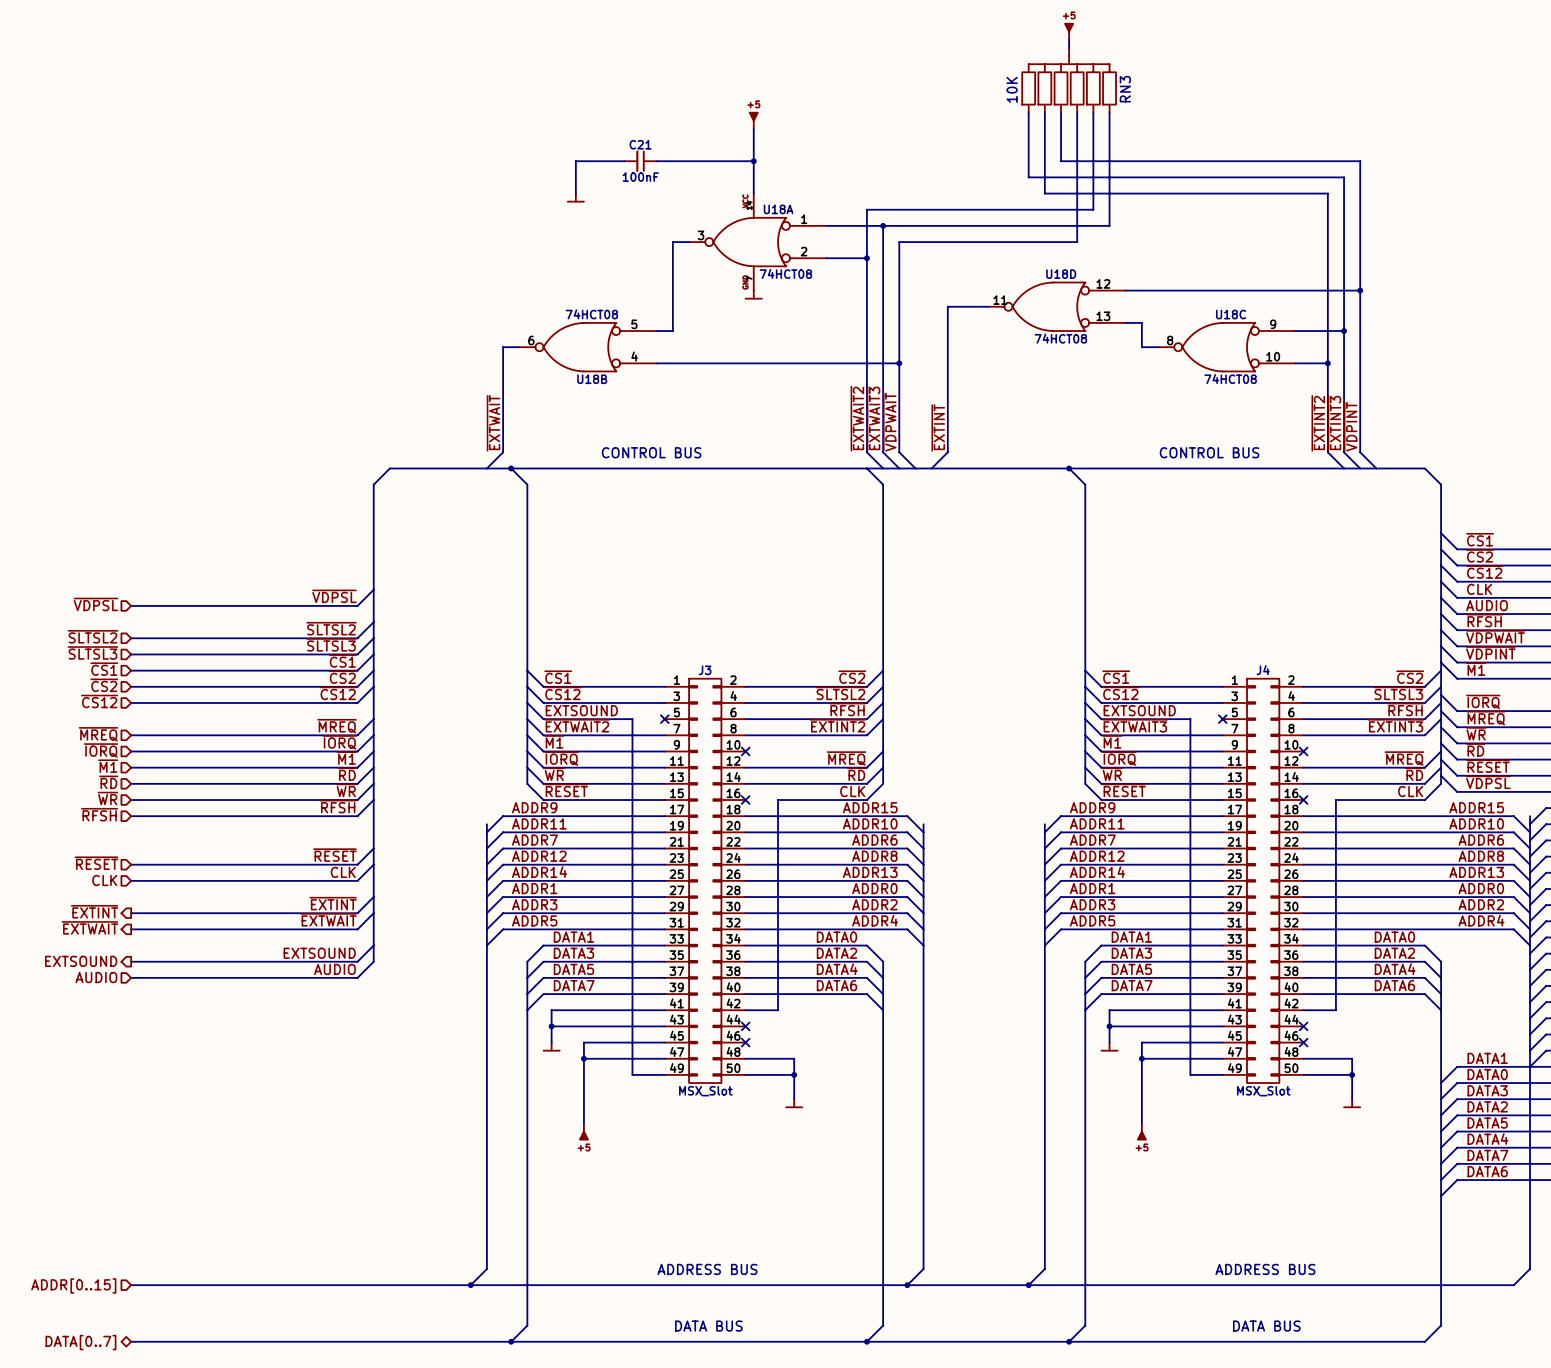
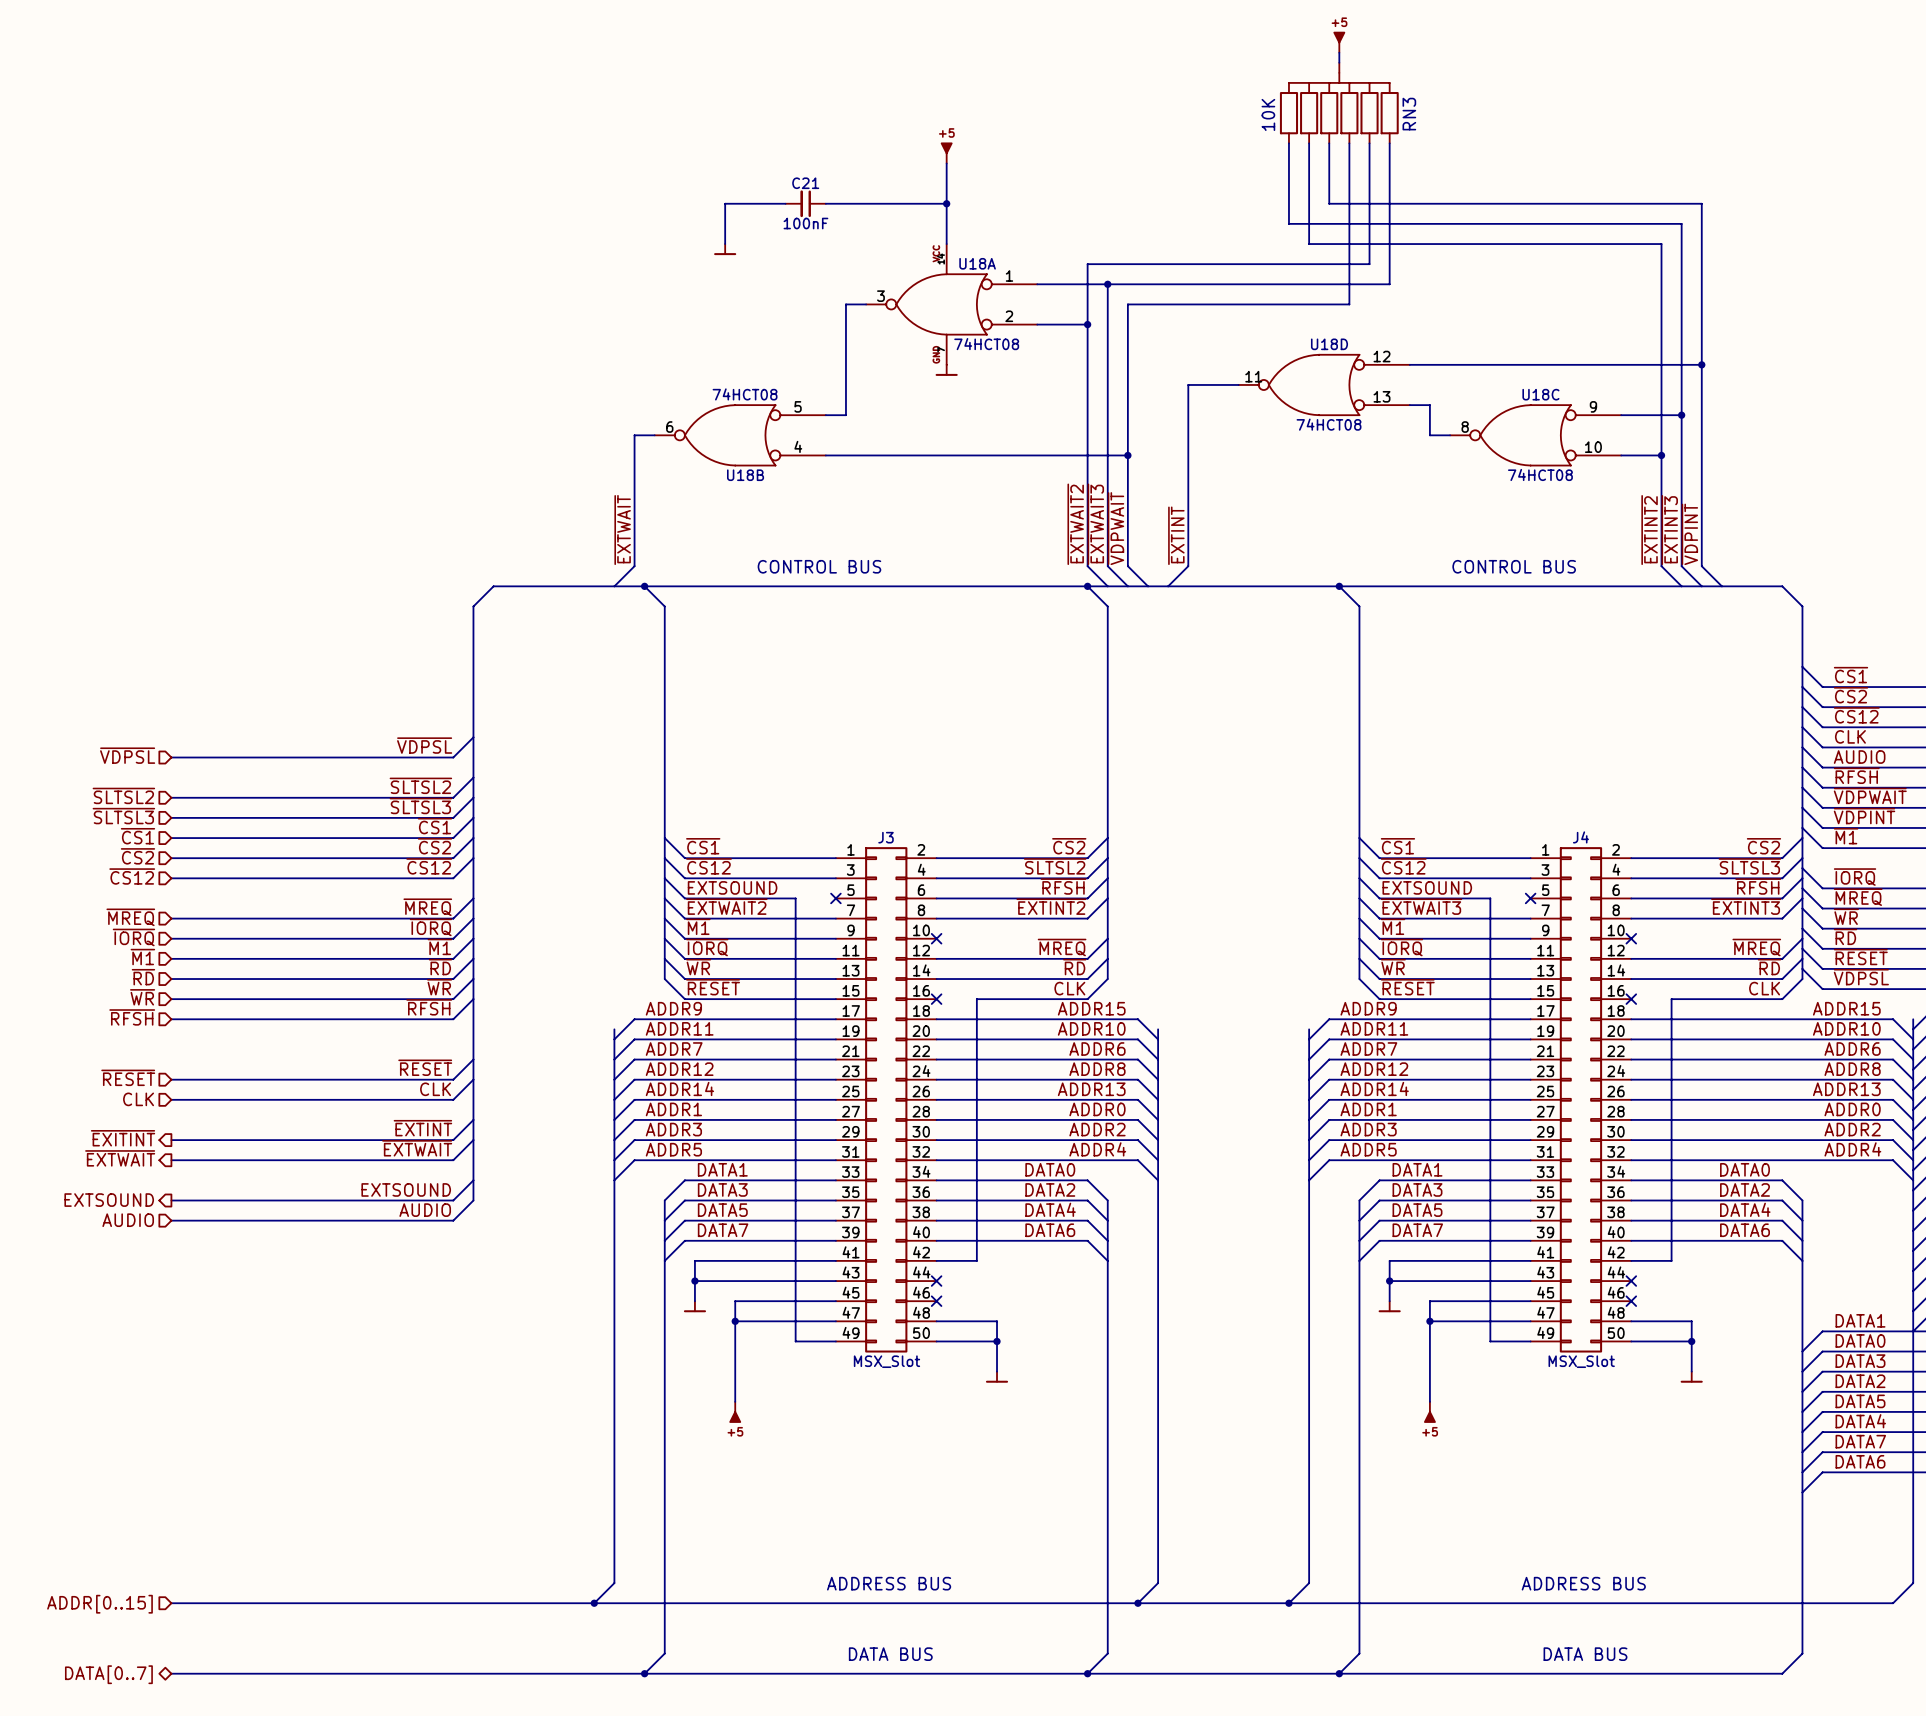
junction: none -> (1087, 586)
hierarchical label: ~{EXTINT} (94, 911) -> ~{EXITINT} (123, 1138)

